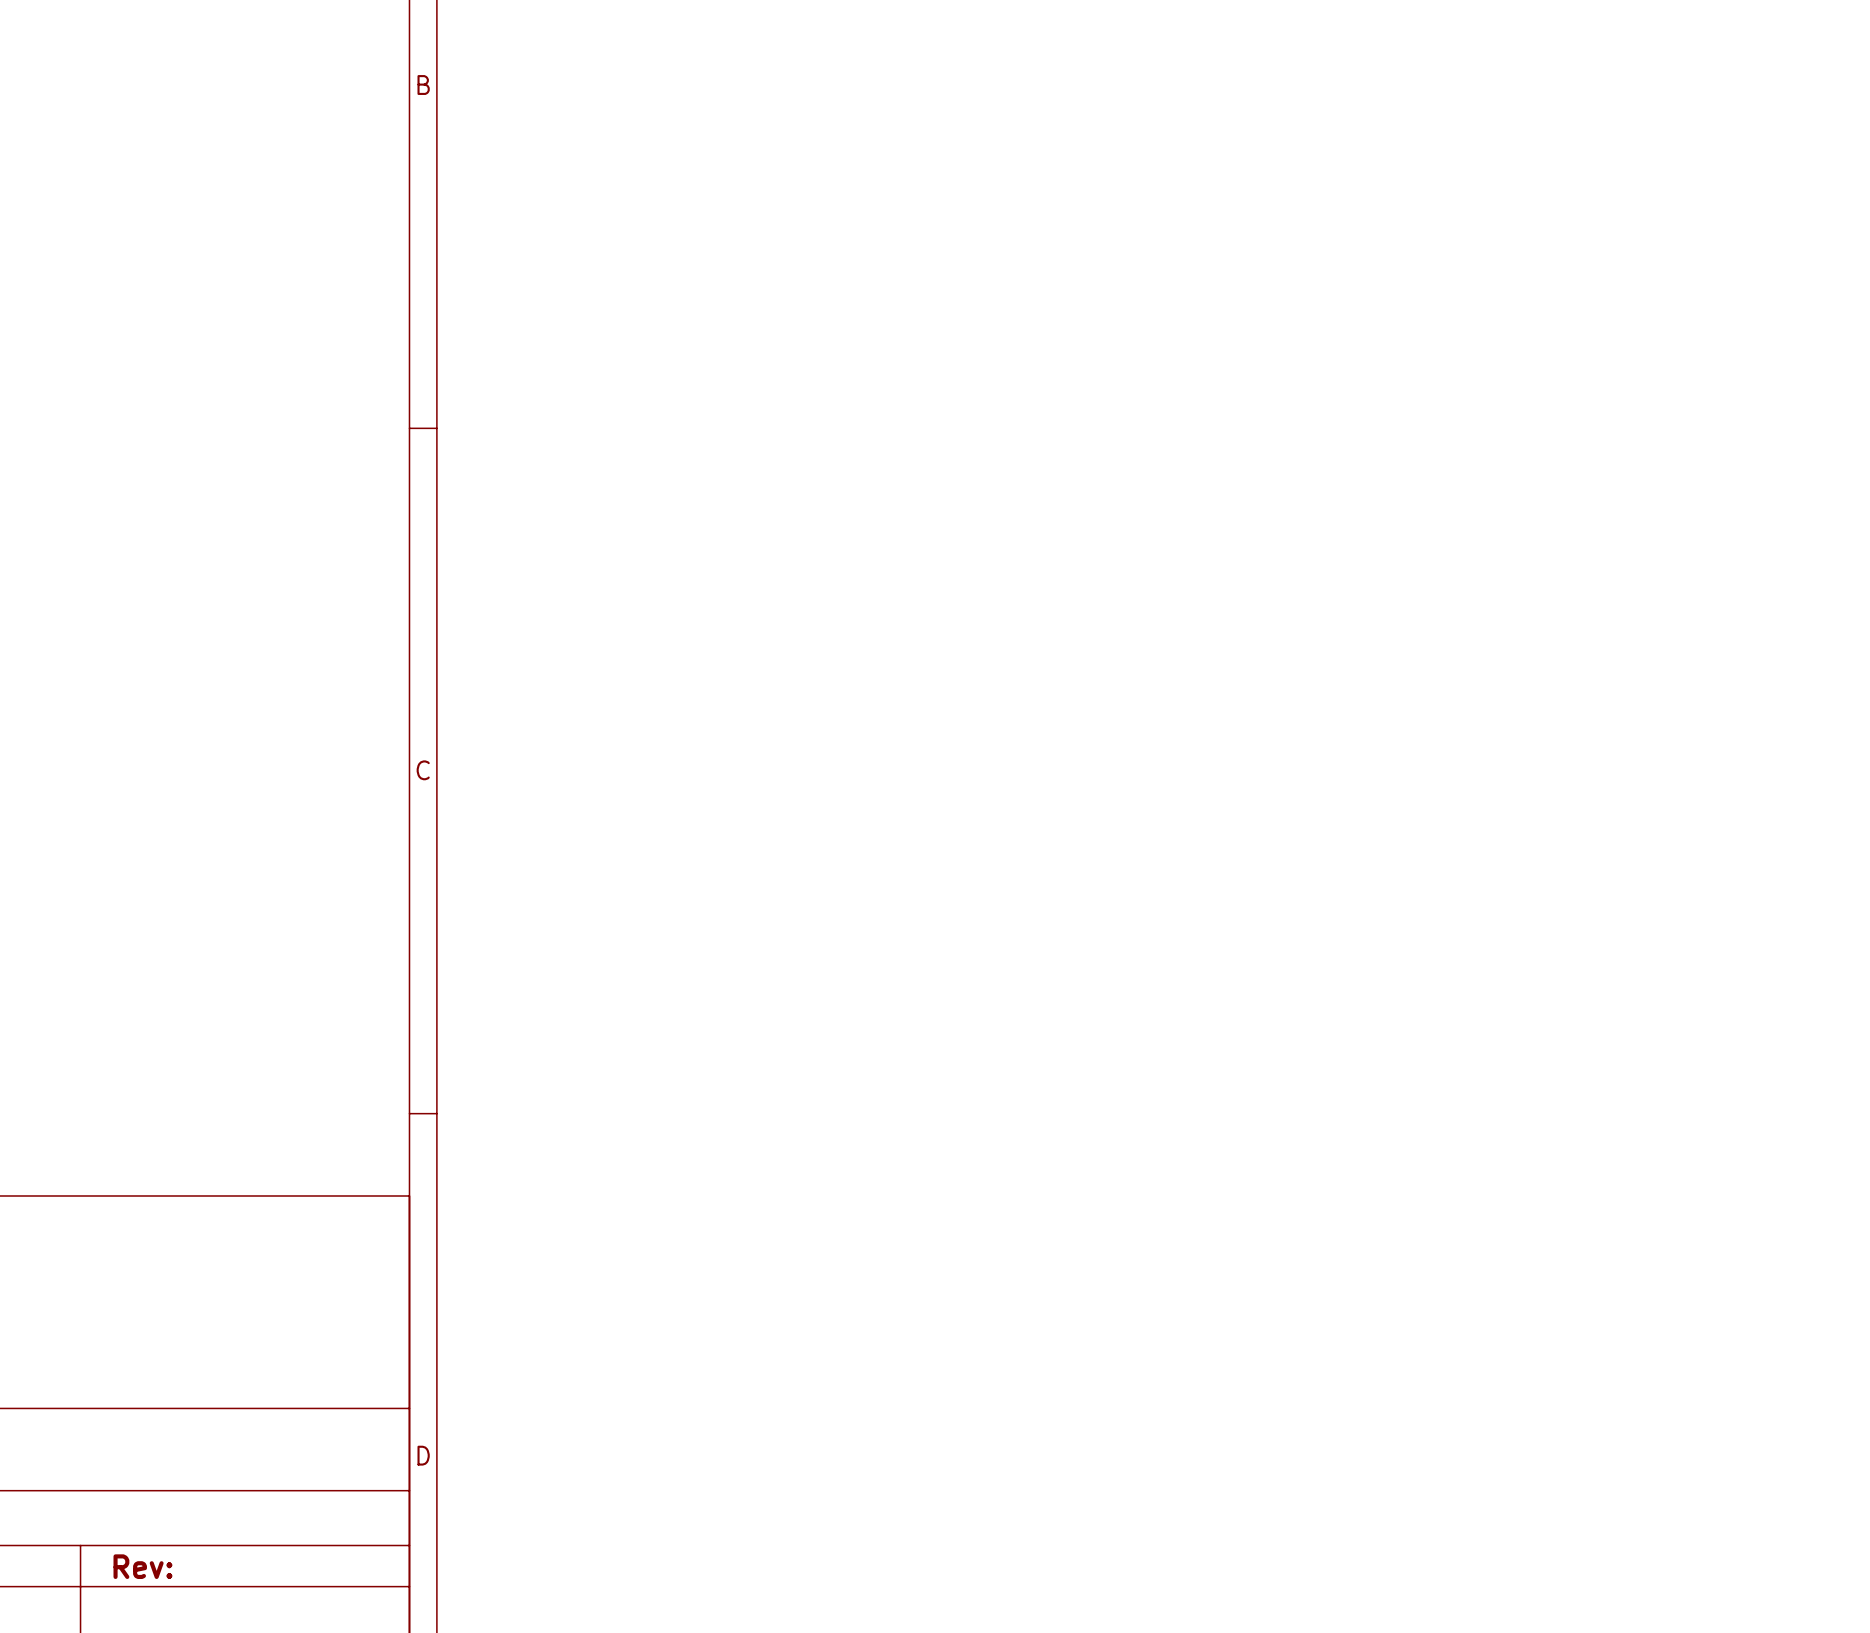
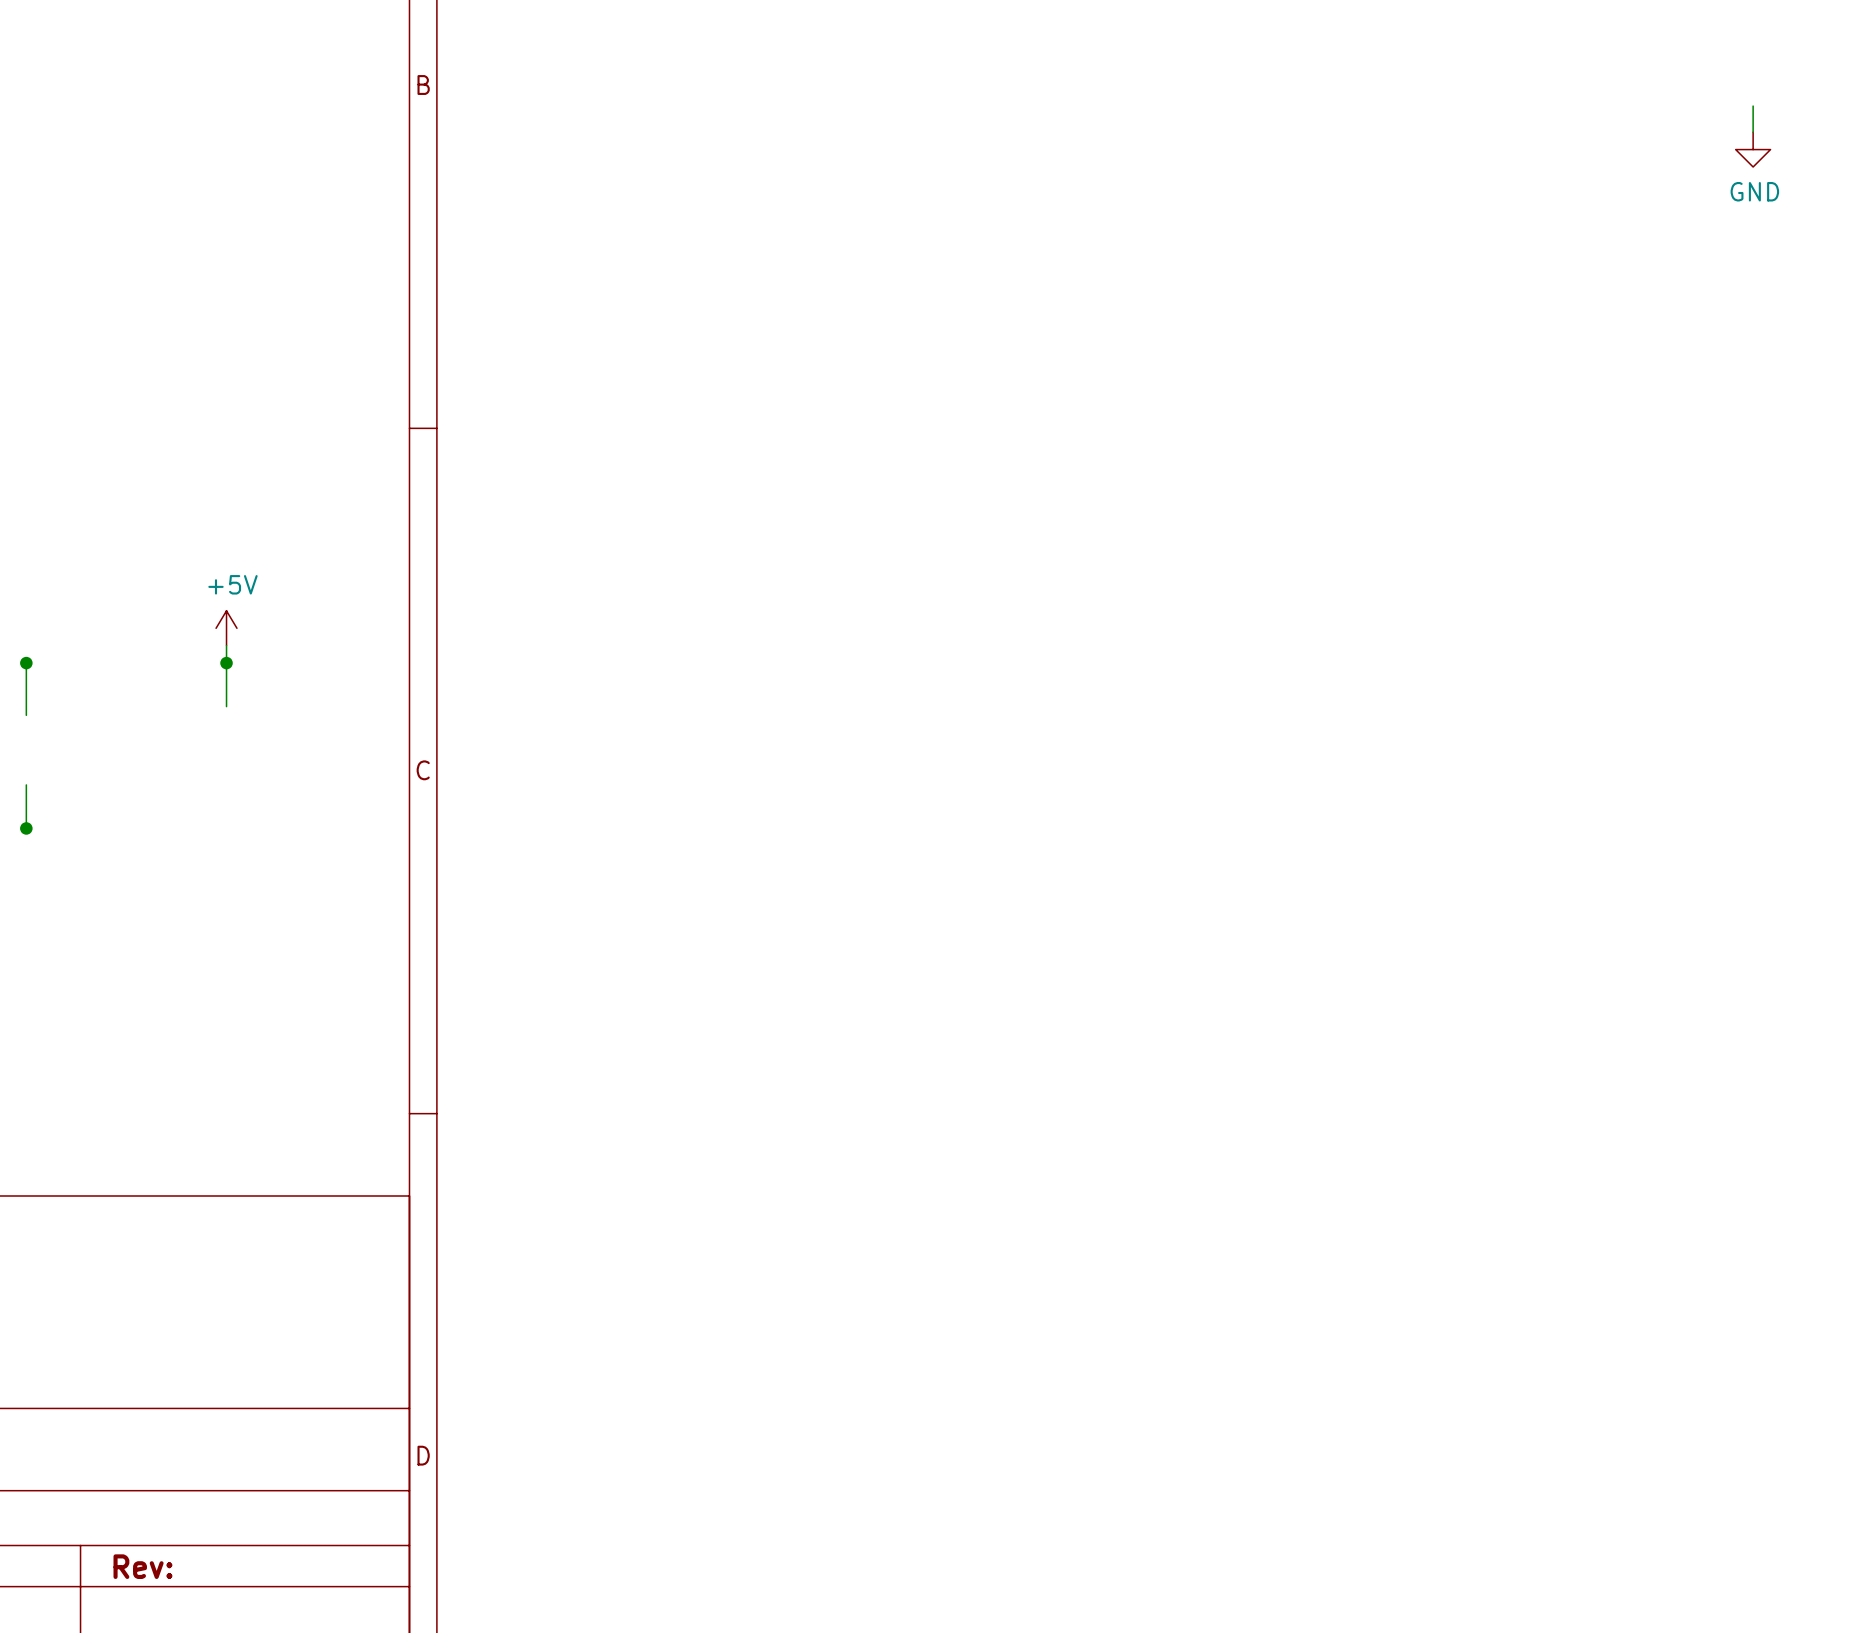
wire: none -> (1753, 106) (1753, 132)
power symbol: none -> GND (1753, 149)
power symbol: none -> +5V (226, 628)
wire: none -> (226, 645) (226, 706)
wire: none -> (26, 663) (26, 715)
junction: none -> (26, 663)
junction: none -> (226, 663)
wire: none -> (26, 784) (26, 828)
junction: none -> (26, 828)

